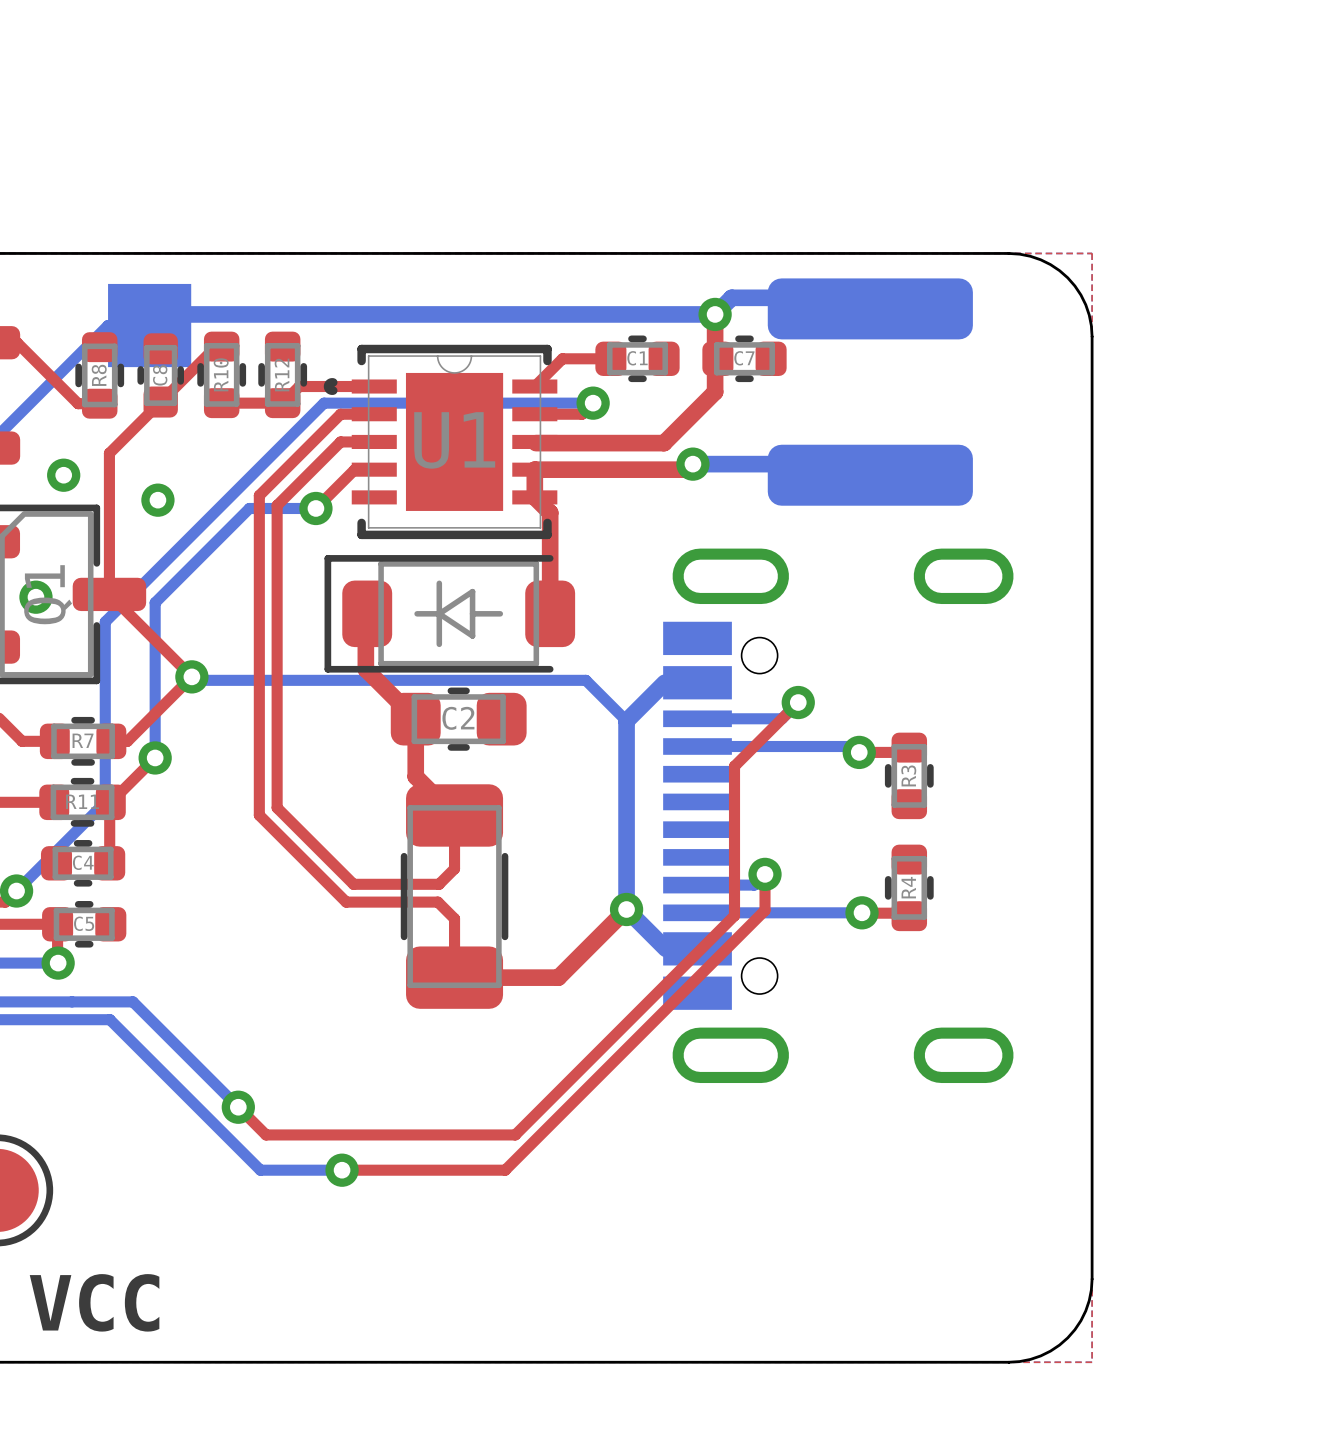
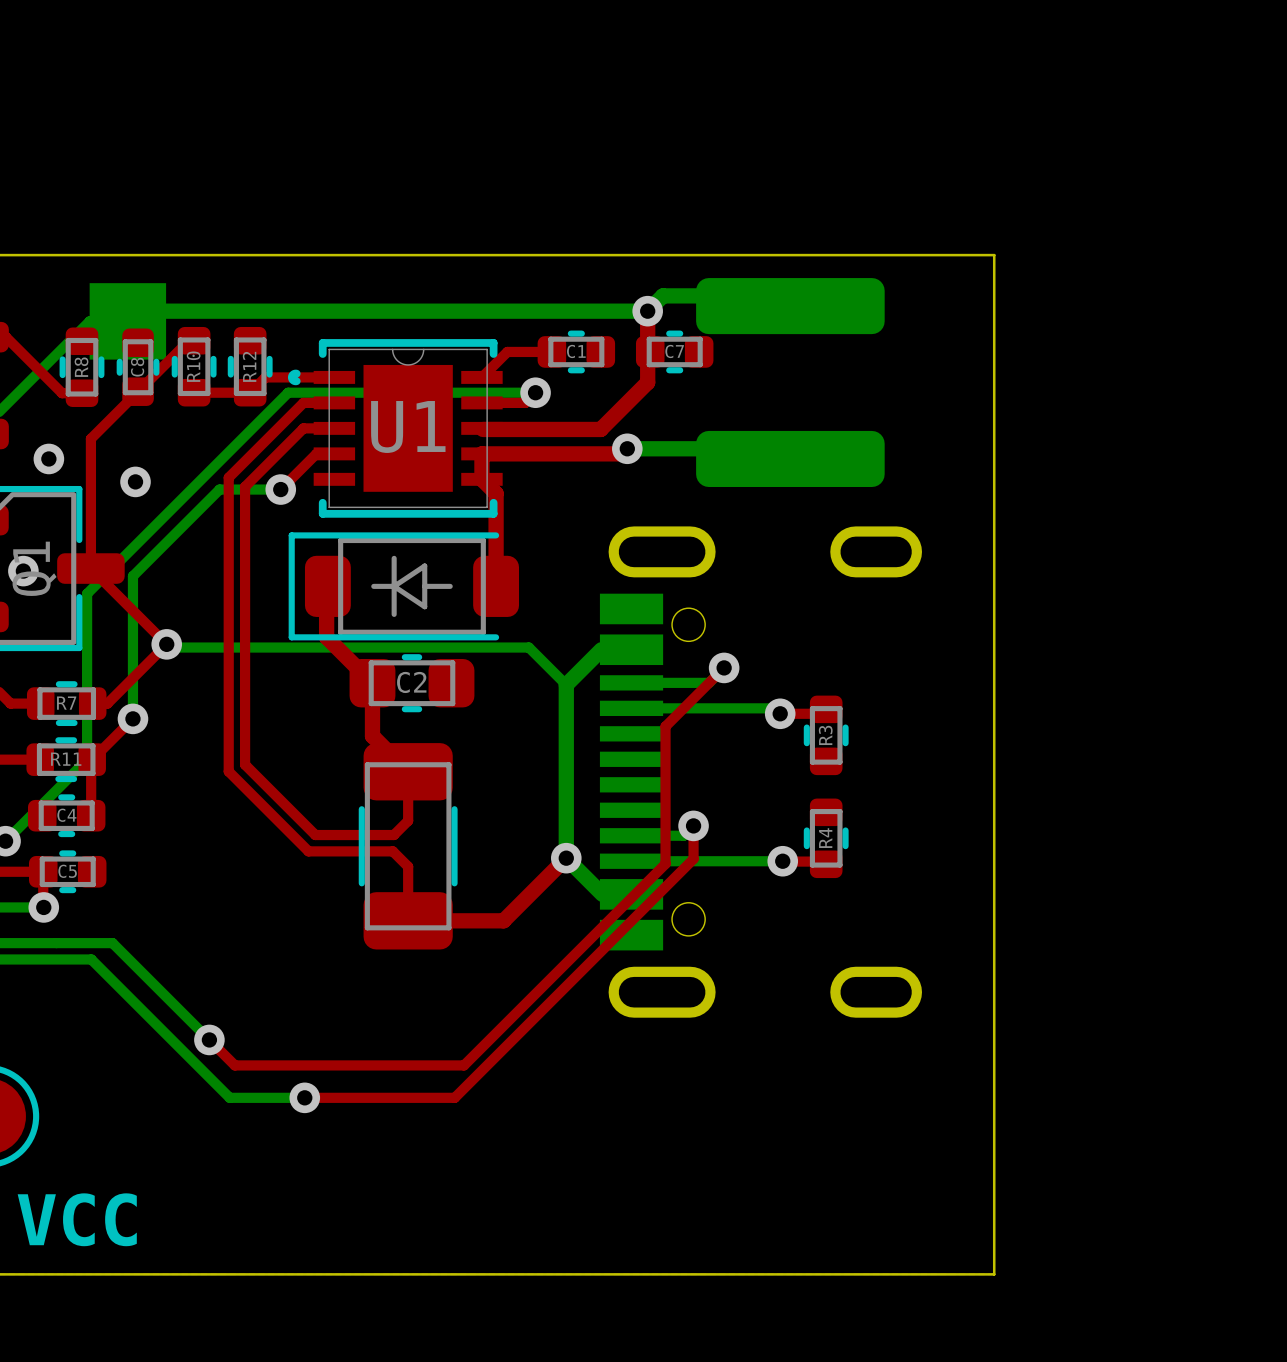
board edge: (1008, 253) (1040, 259) (1067, 277) (1085, 304) (1092, 336) -> (917, 255) (994, 255) (994, 331)
board edge: (1092, 1279) (1085, 1310) (1067, 1337) (1040, 1355) (1008, 1362) -> (994, 1197) (994, 1274) (917, 1274)

